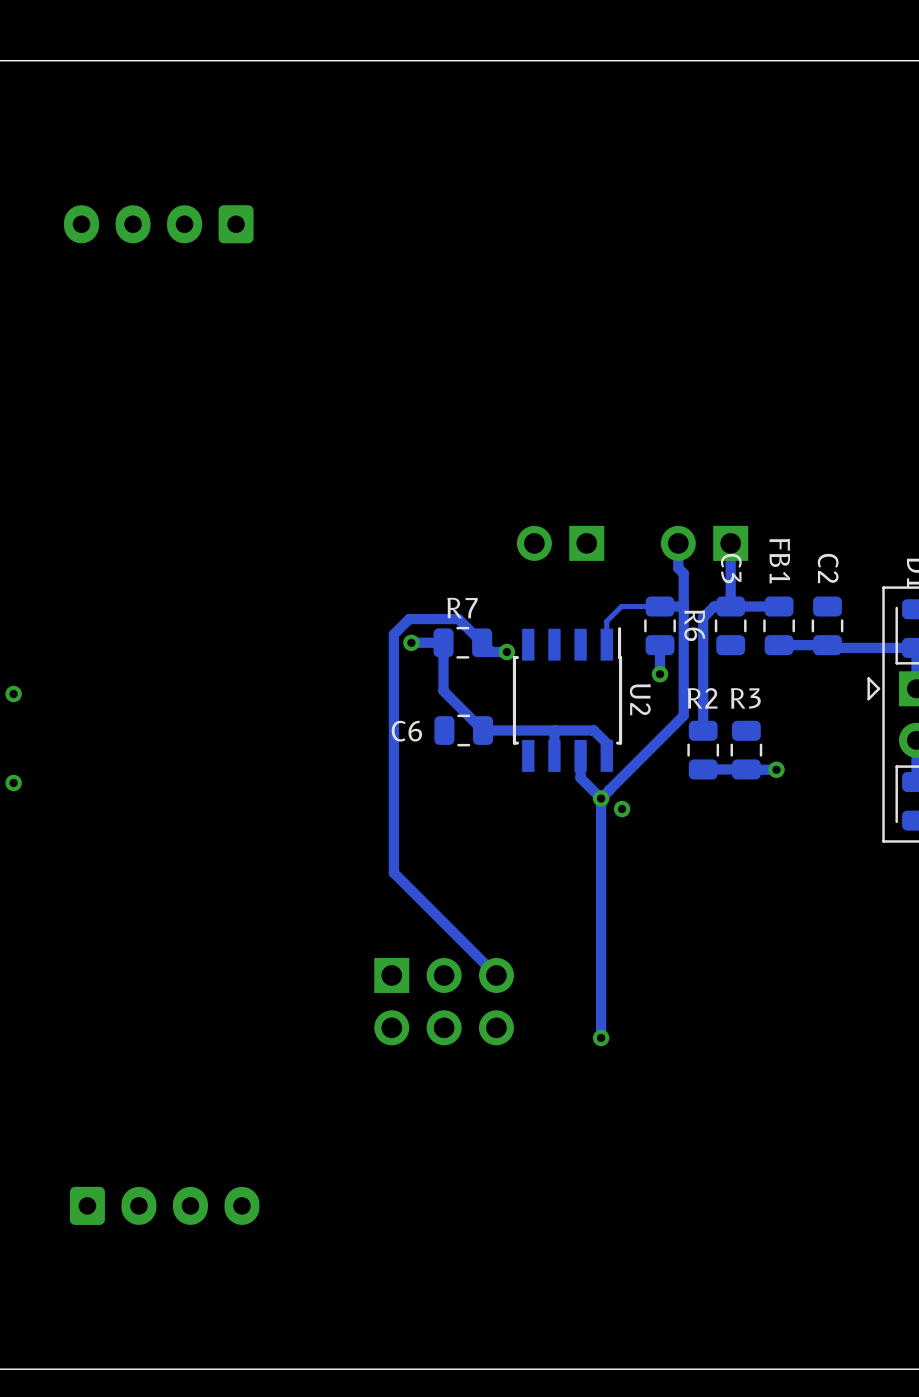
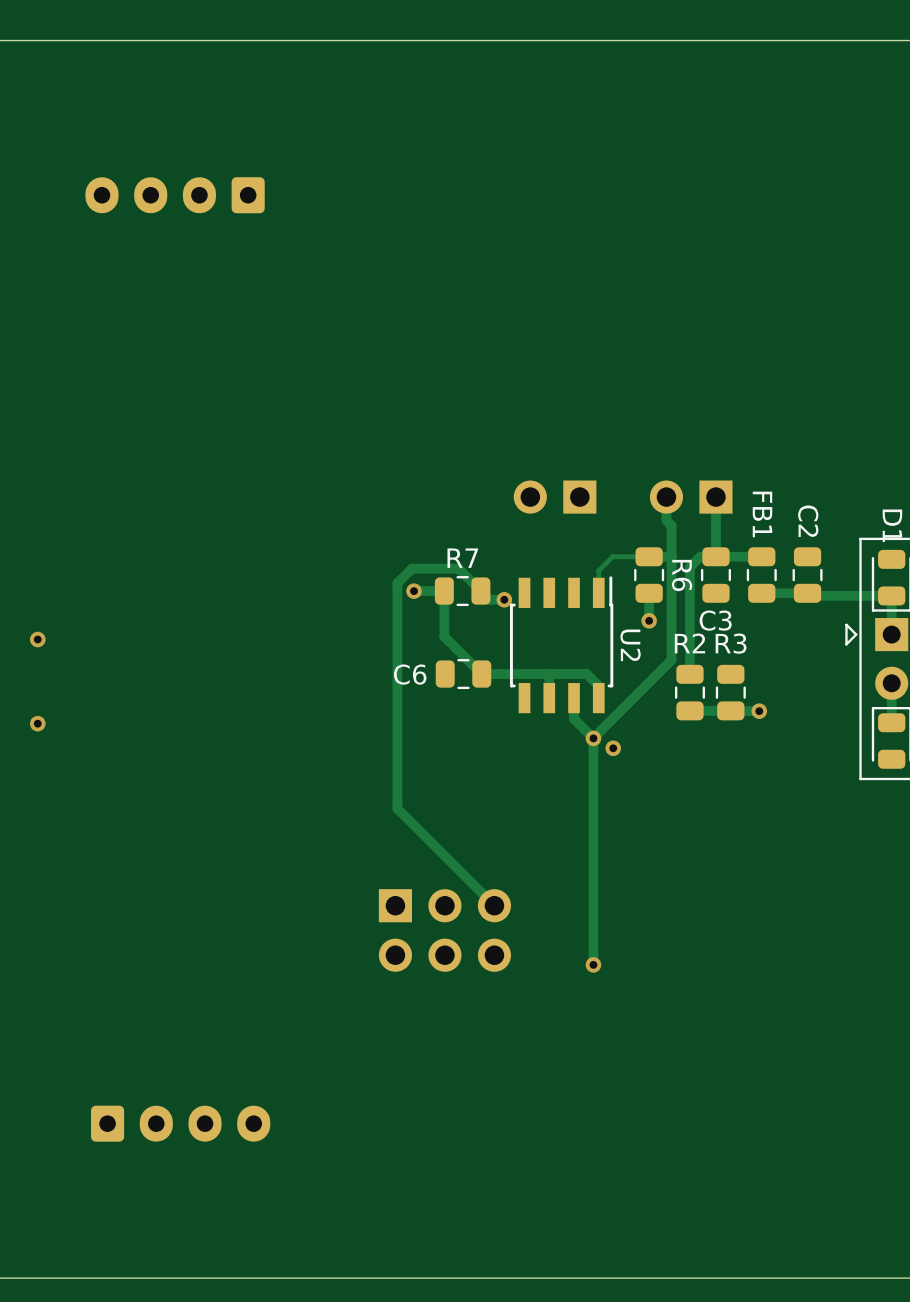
C3 name rotation: 0° (731, 568) -> 90° counterclockwise (715, 620)
C3 name position: C3 (731, 568) -> C3 (715, 620)

